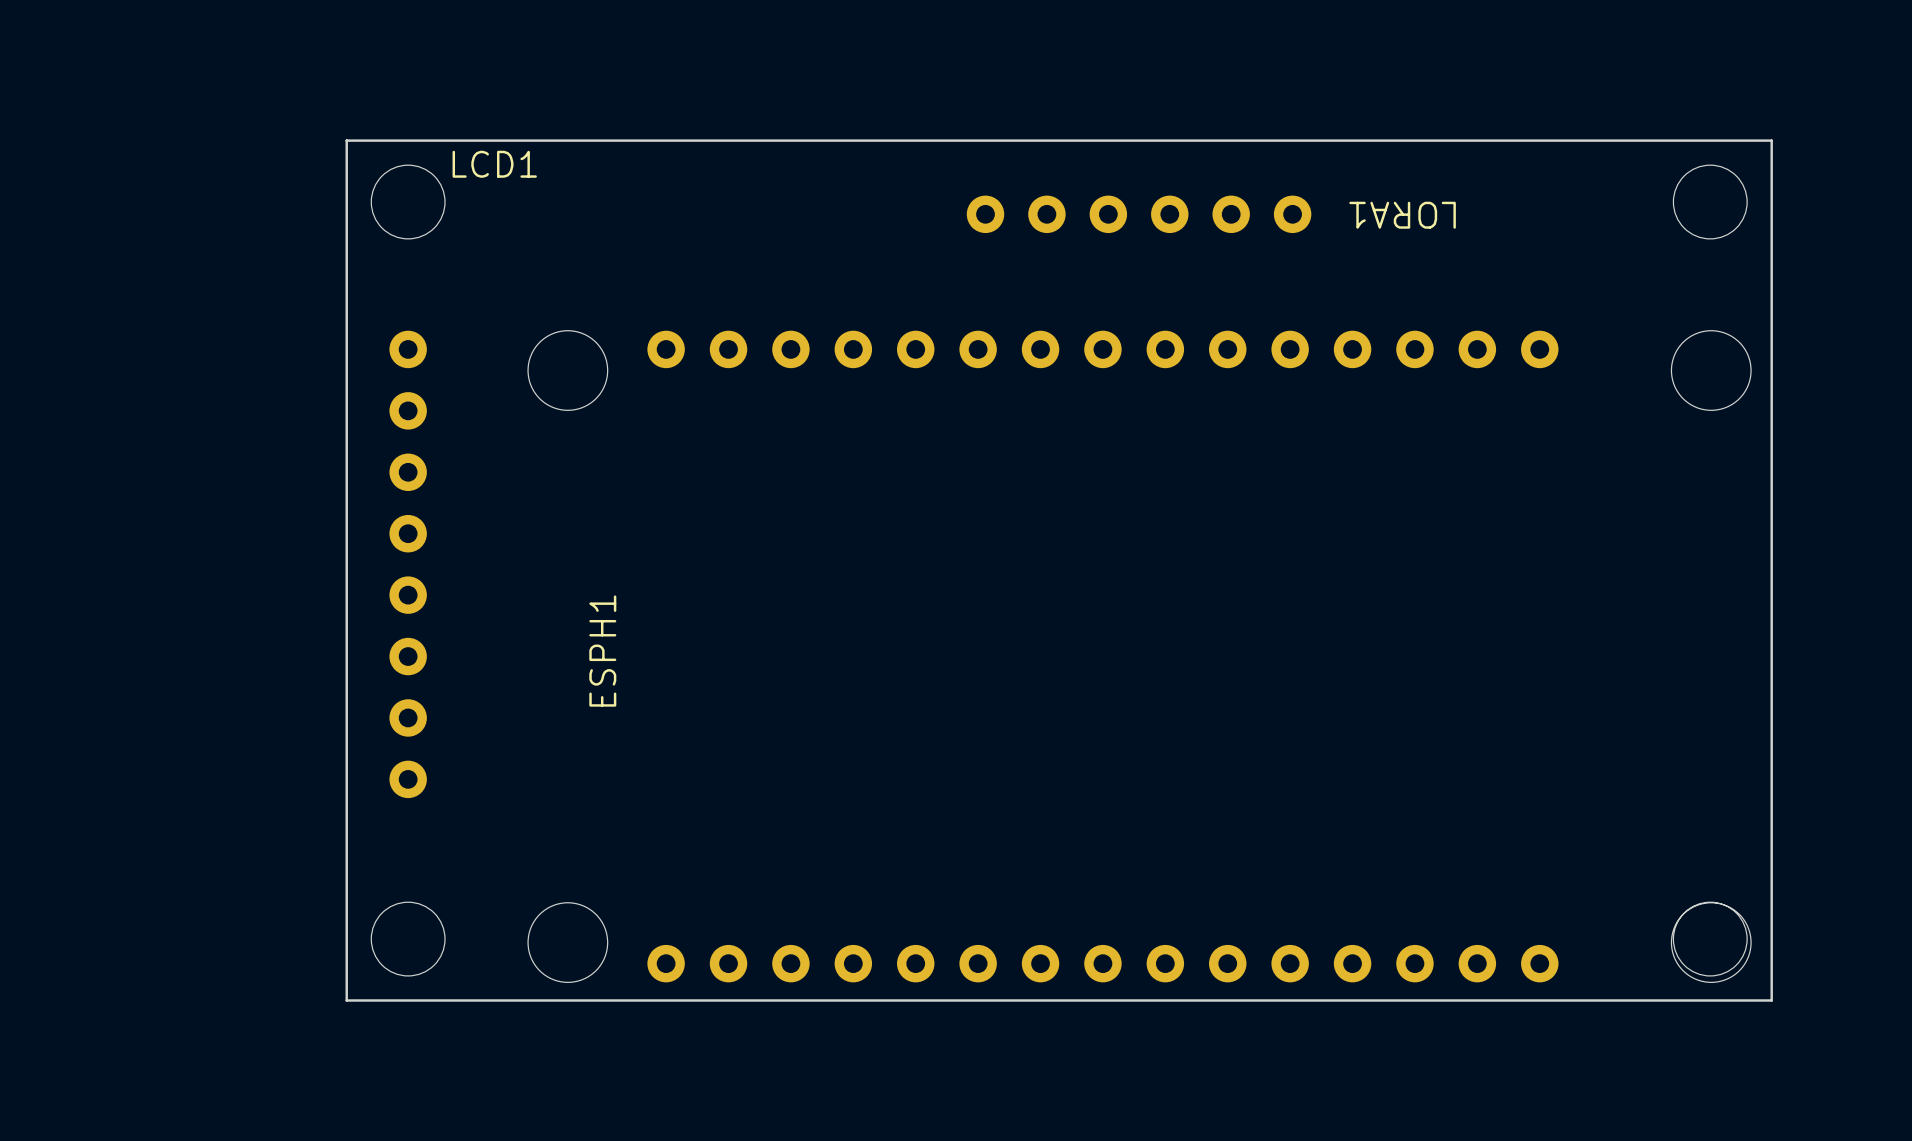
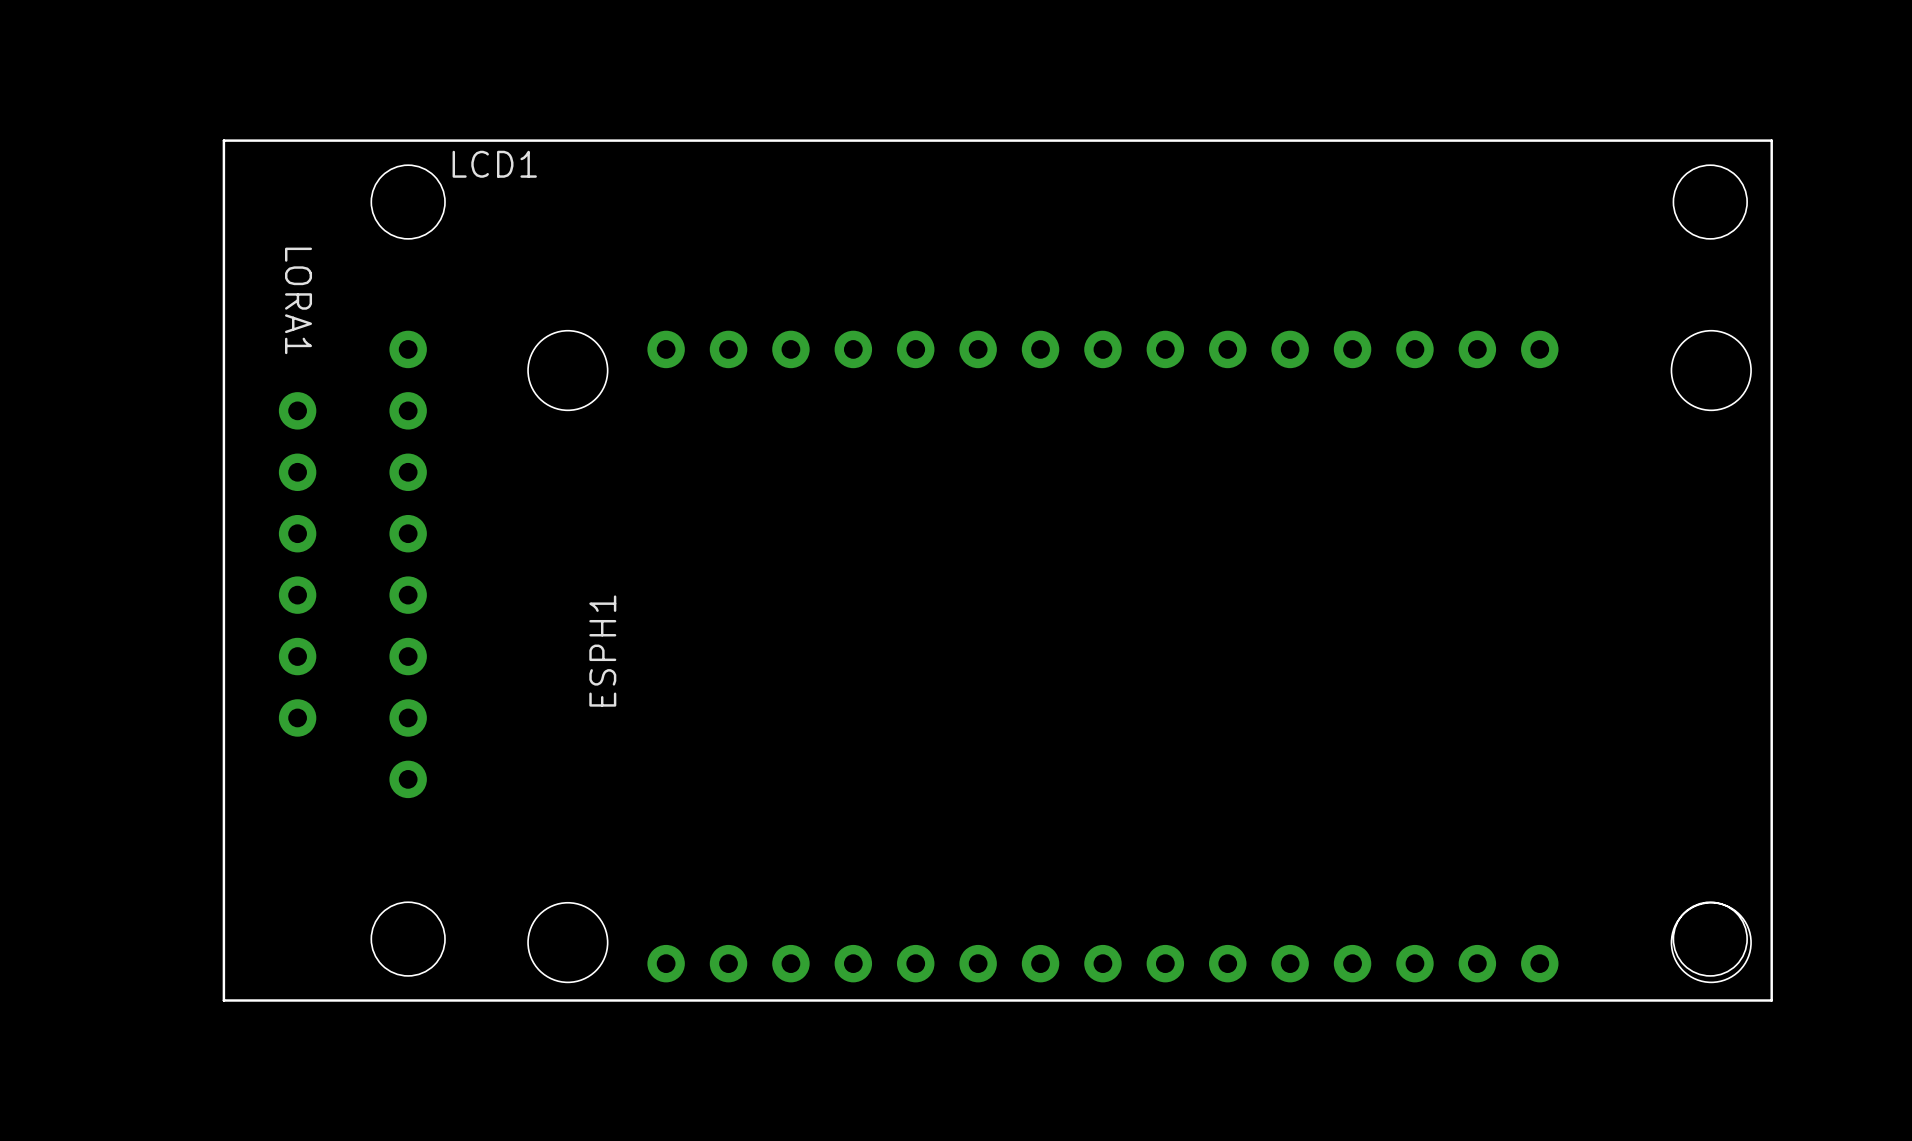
board edge: (346, 140) (346, 1000) -> (346, 140) (223, 140) (223, 1000) (346, 1000)
LORA1 rotation: 0° (1139, 214) -> 90° clockwise (297, 564)
LORA1 position: (1139, 214) -> (297, 564)
LORA1 name position: LORA1 (1402, 215) -> LORA1 (298, 300)

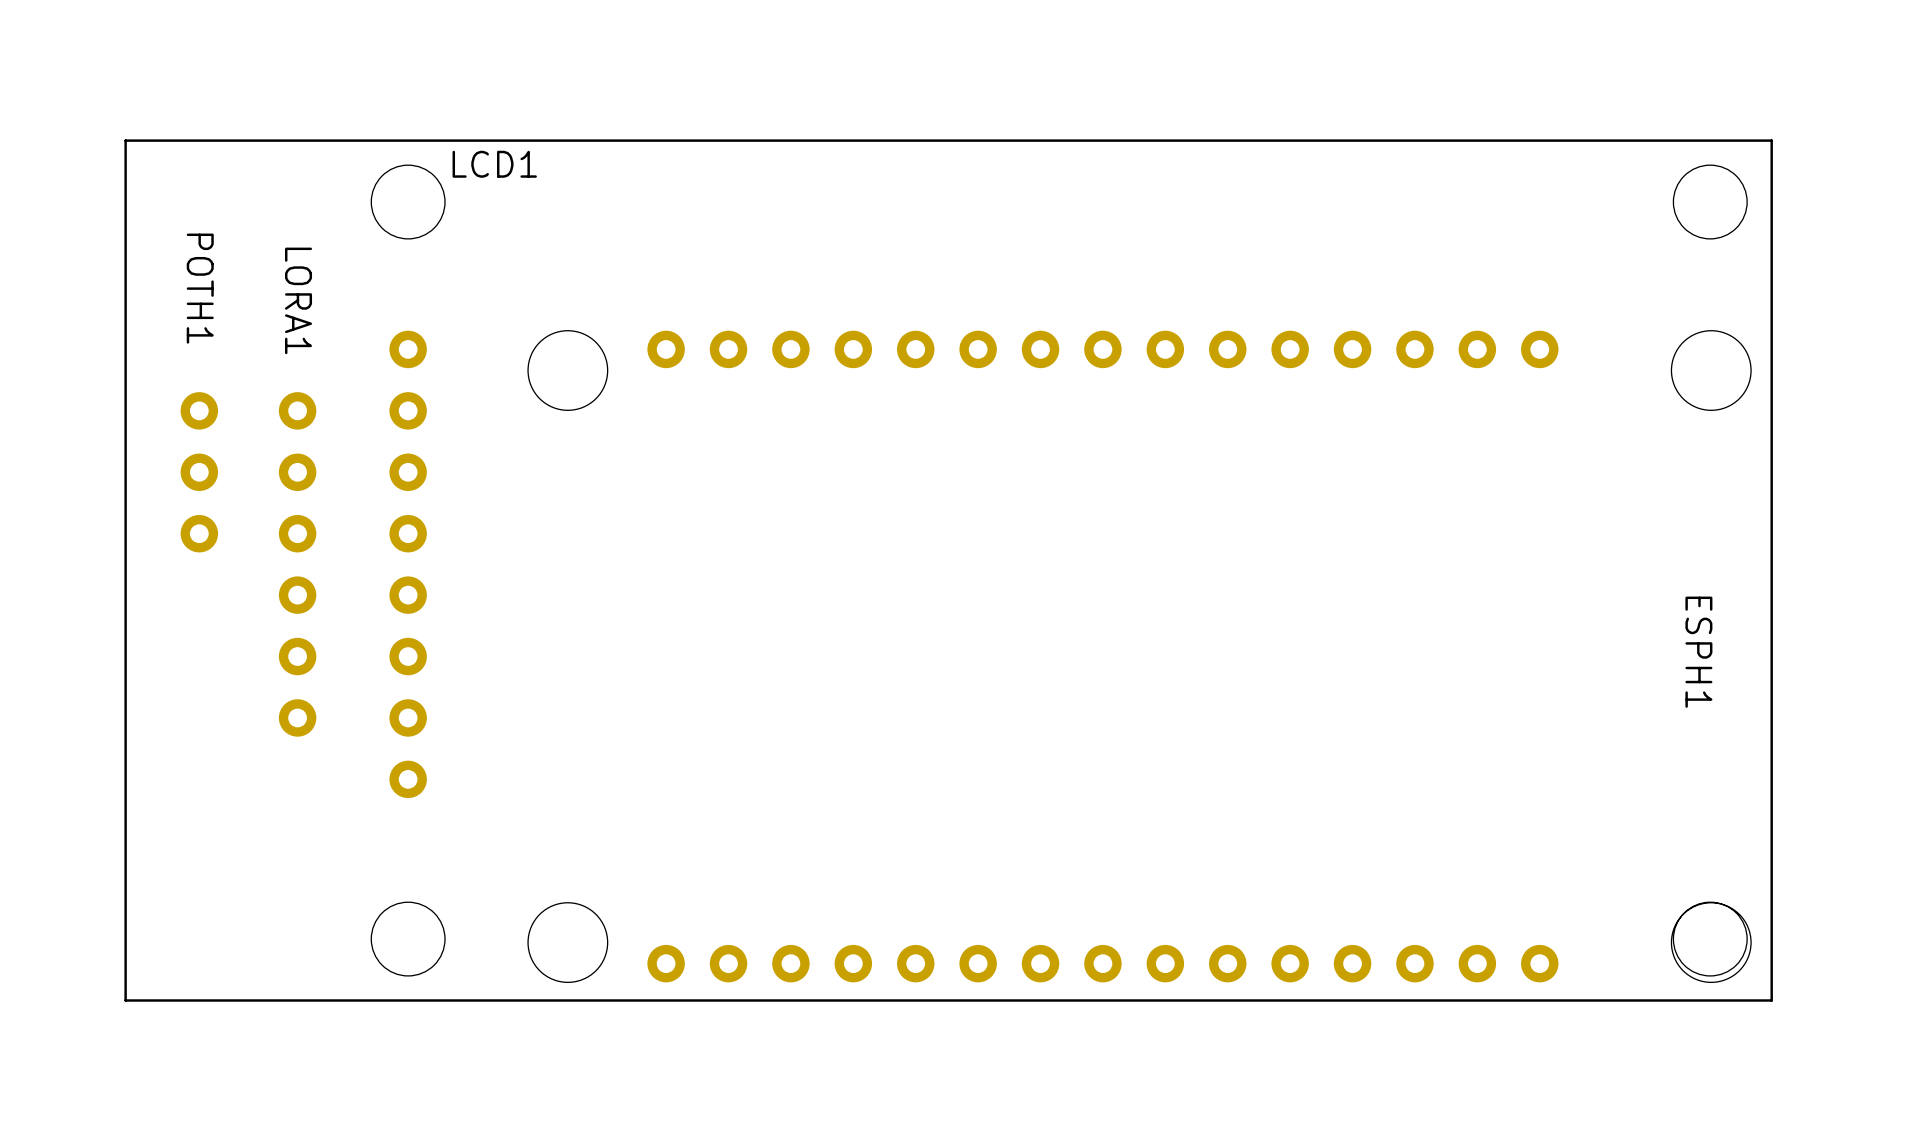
board edge: (223, 140) (223, 1000) -> (223, 140) (125, 140) (125, 1000) (223, 1000)
POTH1: none -> (199, 472)
ESPH1 name rotation: 0° (602, 651) -> 180° (1698, 652)
ESPH1 name position: ESPH1 (602, 651) -> ESPH1 (1698, 652)

